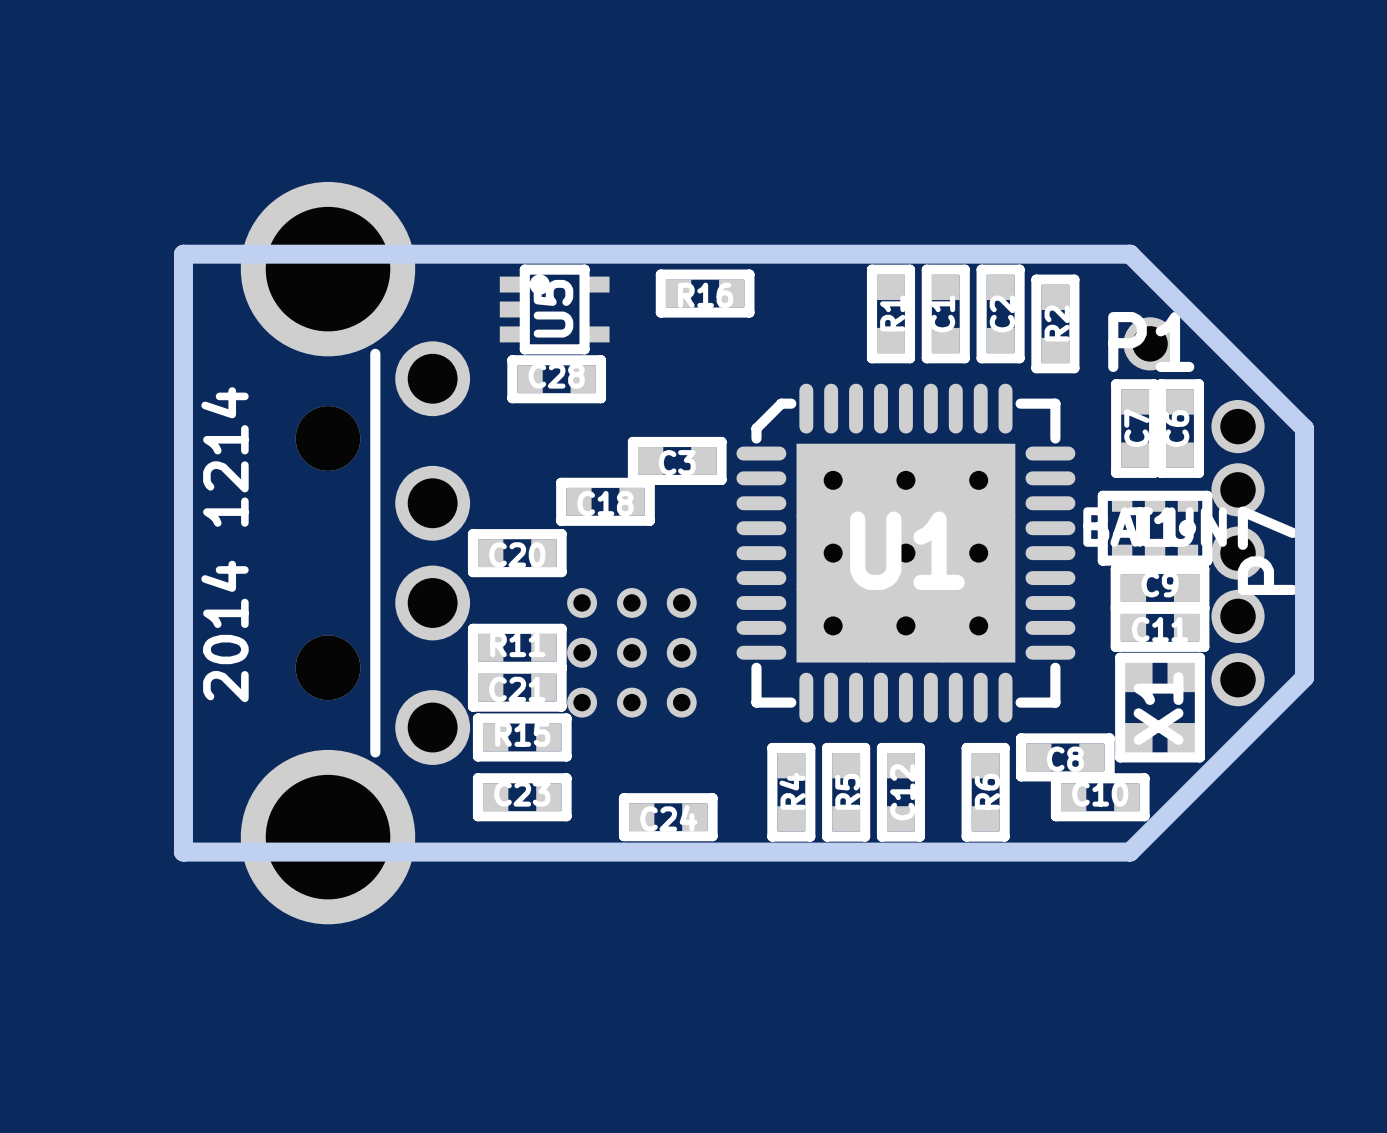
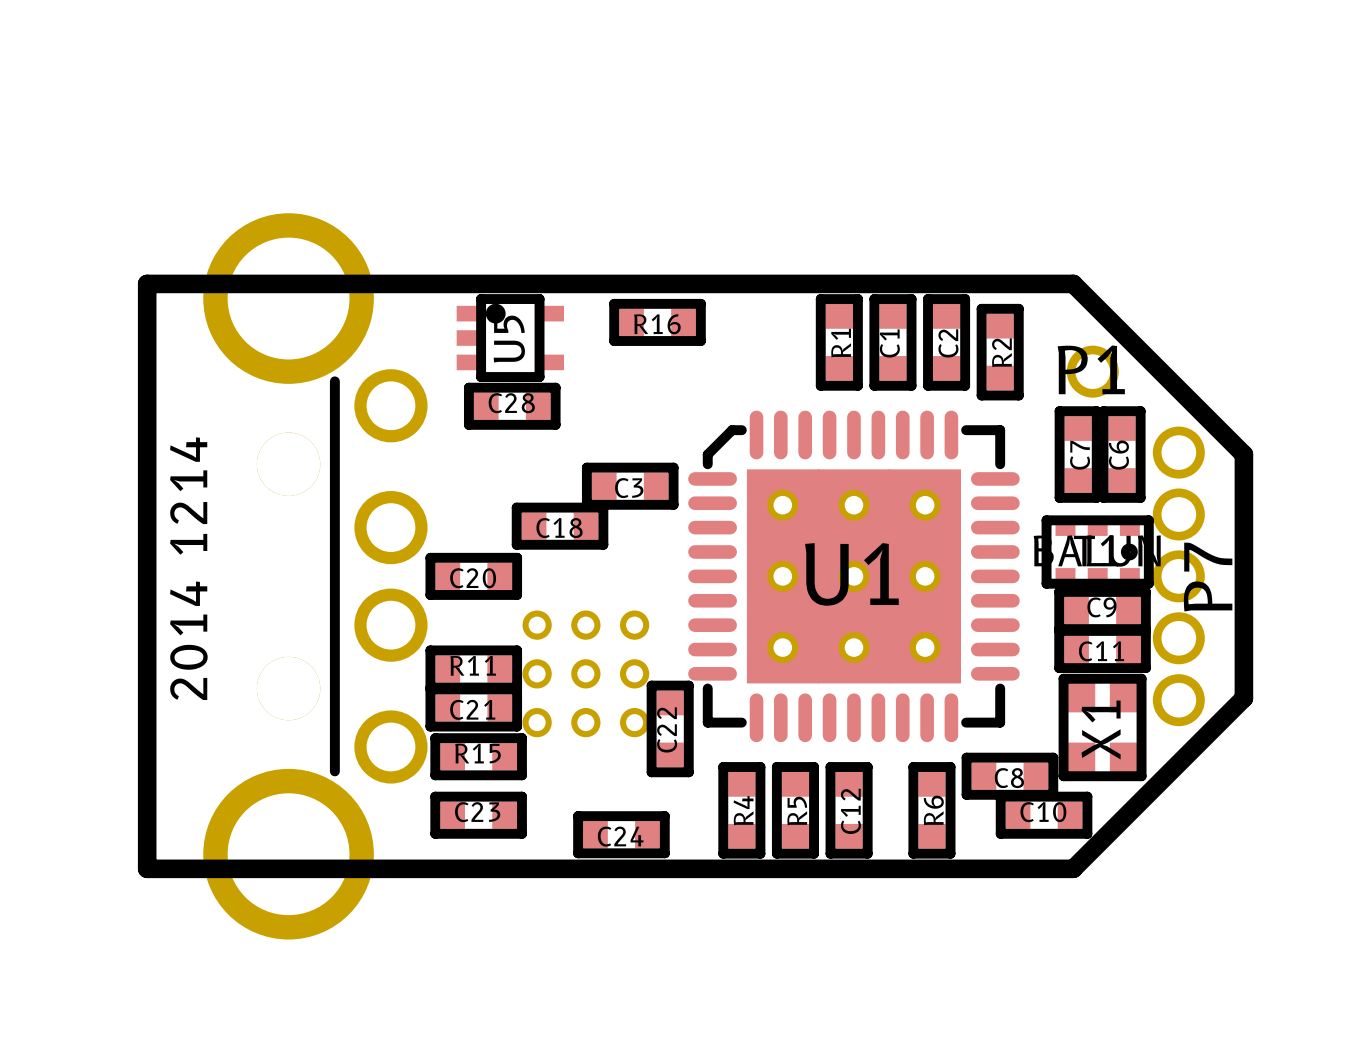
C22: none -> (670, 728)

